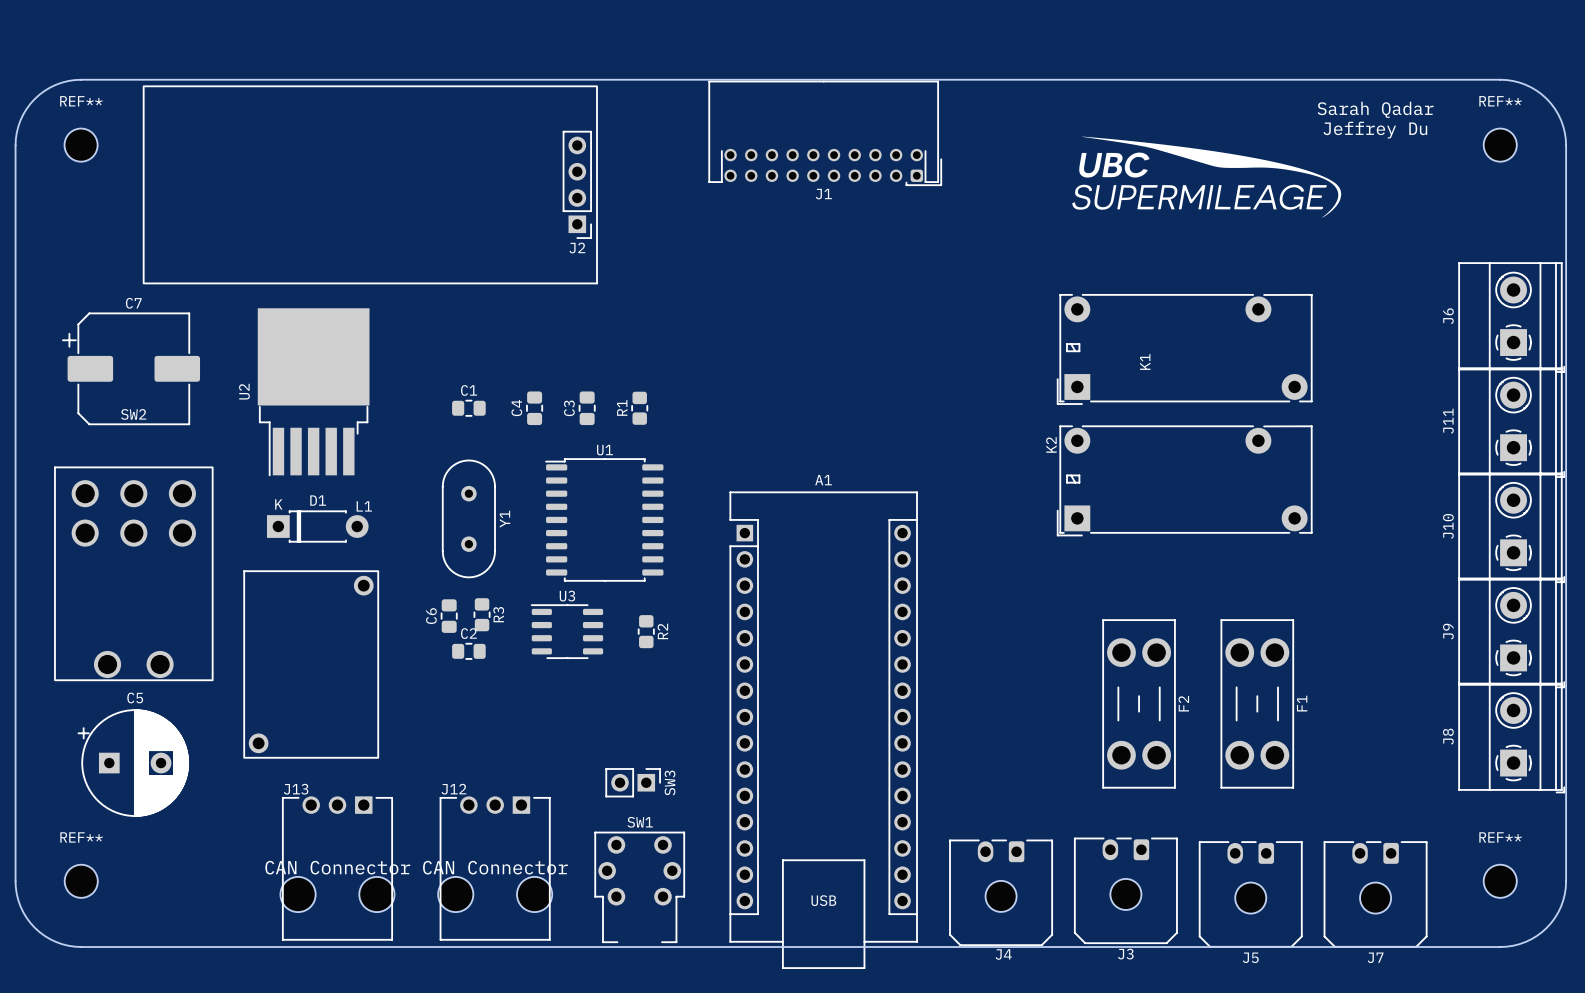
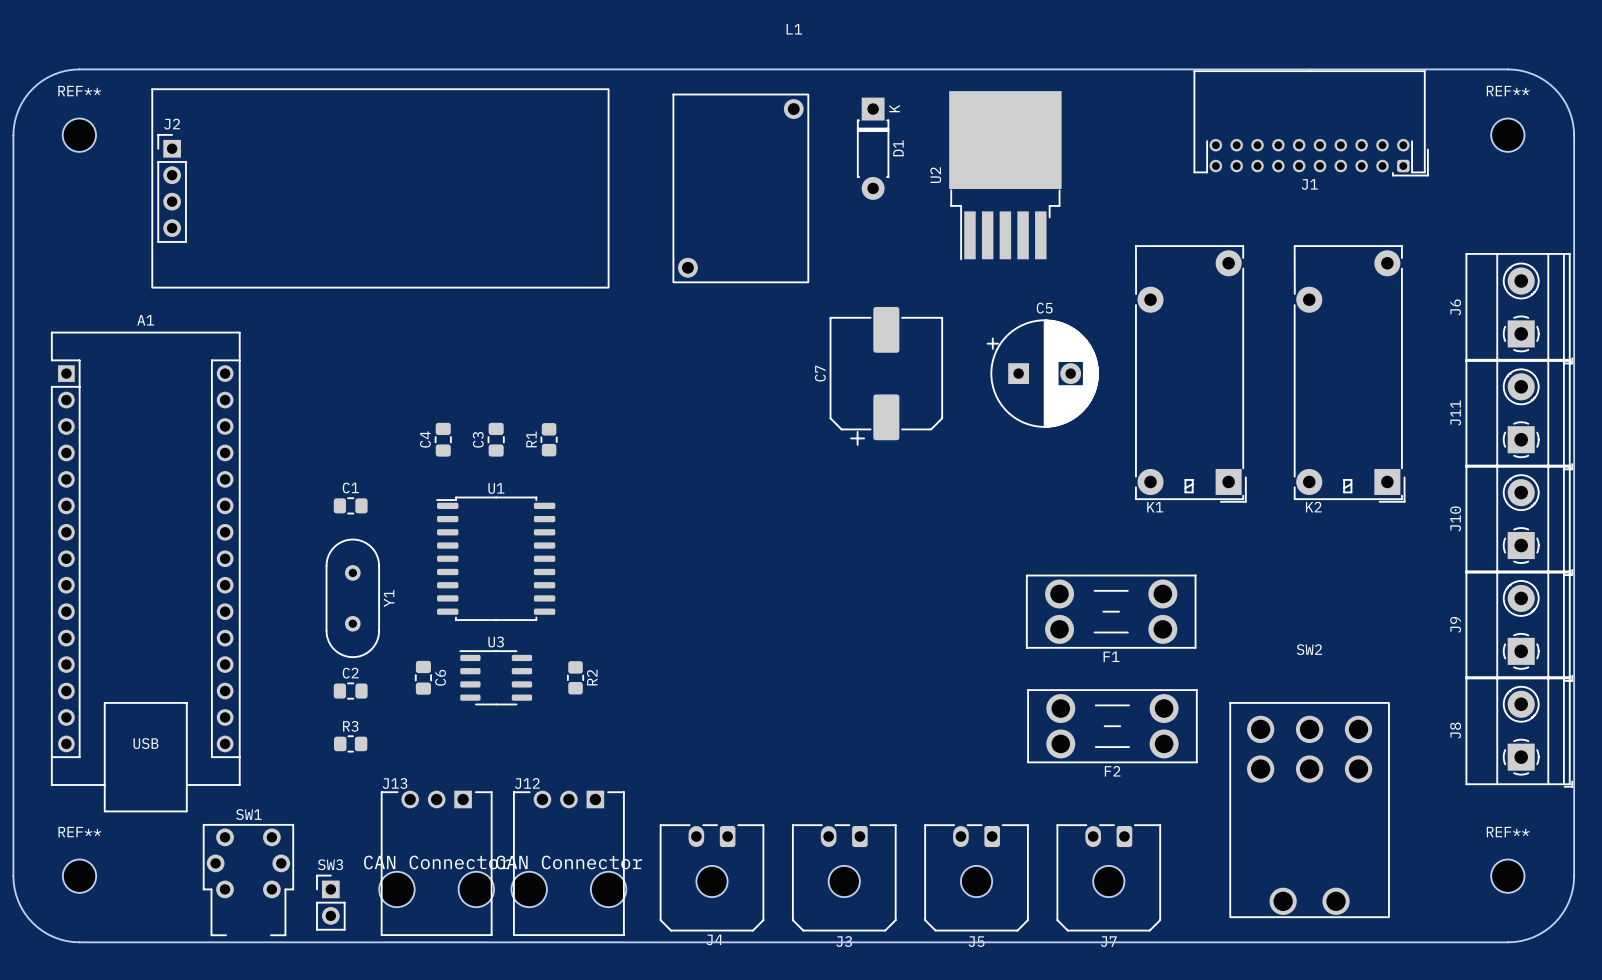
text: Sarah Qadar (1375, 109) -> none
text: Jeffrey Du (1375, 130) -> none
J1 position: (825, 133) -> (1311, 123)
drawing: [1072, 136, 1342, 218] -> none
J2 rotation: 0° (370, 184) -> 180° (380, 188)
K1 rotation: 0° (1184, 349) -> 90° counterclockwise (1190, 373)
K1 name position: K1 (1145, 361) -> K1 (1155, 507)
C7 rotation: 0° (131, 368) -> 90° counterclockwise (886, 376)
C7 position: (131, 368) -> (886, 376)
U2 position: (313, 392) -> (1005, 175)
C1 position: (468, 408) -> (350, 505)
C4 position: (534, 408) -> (443, 439)
C3 position: (587, 408) -> (496, 439)
R1 position: (639, 408) -> (549, 439)
K2 rotation: 0° (1184, 480) -> 90° counterclockwise (1349, 373)
K2 position: (1184, 480) -> (1349, 373)
Y1 position: (468, 518) -> (352, 598)
U1 position: (604, 519) -> (495, 558)
D1 rotation: 0° (317, 526) -> 90° clockwise (873, 148)
D1 position: (317, 526) -> (873, 148)
SW2 position: (133, 573) -> (1309, 810)
R3 rotation: 0° (482, 614) -> 90° clockwise (350, 743)
R3 position: (482, 614) -> (350, 743)
R3 name position: R3 (498, 614) -> R3 (350, 726)
C6 name position: C6 (431, 616) -> C6 (440, 677)
C6 position: (449, 616) -> (423, 677)
U3 position: (567, 631) -> (495, 677)
R2 position: (646, 631) -> (575, 677)
C2 position: (468, 651) -> (350, 691)
L1 position: (311, 664) -> (740, 188)
F2 rotation: 0° (1139, 703) -> 90° clockwise (1112, 726)
F1 rotation: 0° (1257, 703) -> 90° clockwise (1111, 611)
F1 position: (1257, 703) -> (1111, 611)
A1 position: (823, 730) -> (145, 571)
C5 position: (133, 763) -> (1042, 373)
SW3 rotation: 0° (633, 782) -> 90° counterclockwise (330, 902)
SW3 position: (633, 782) -> (330, 902)
J13 position: (337, 868) -> (436, 863)
J12 position: (495, 868) -> (568, 863)
SW1 position: (639, 887) -> (248, 880)
J3 position: (1125, 890) -> (844, 877)
J4 position: (1001, 892) -> (712, 877)
J5 position: (1250, 894) -> (976, 877)
J7 position: (1375, 894) -> (1108, 877)

